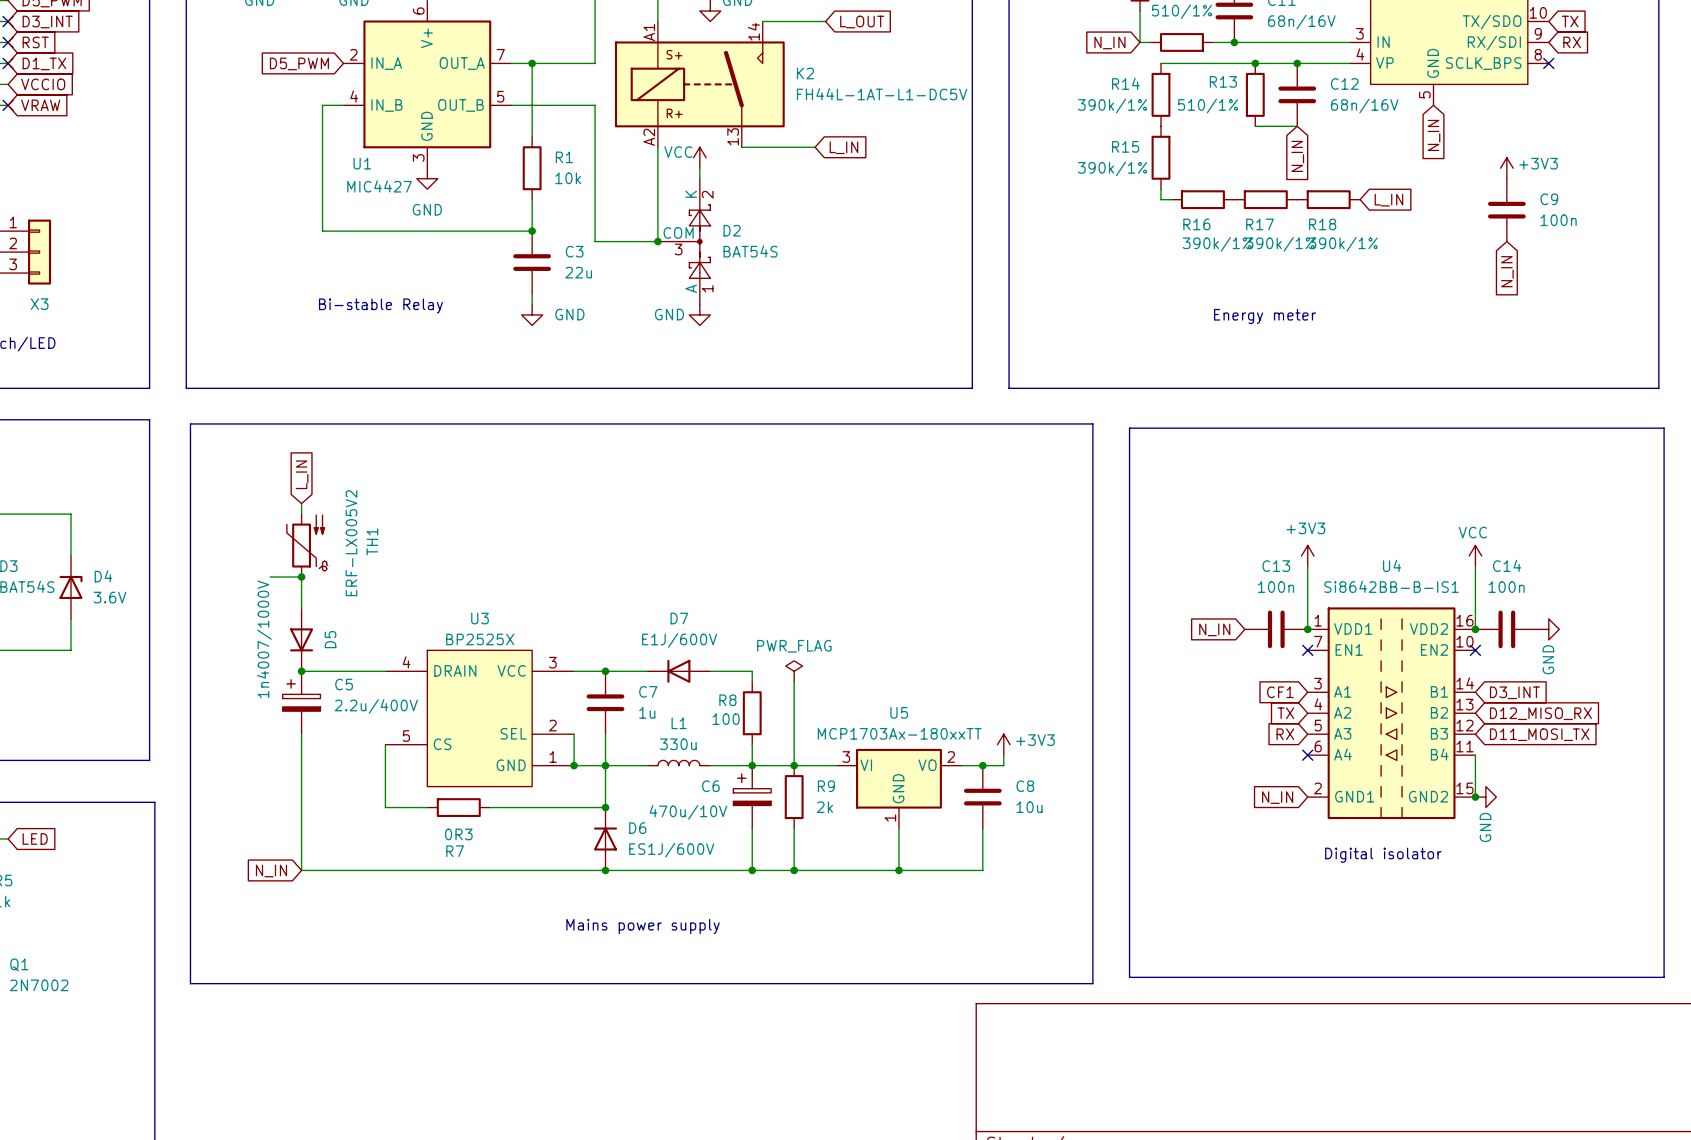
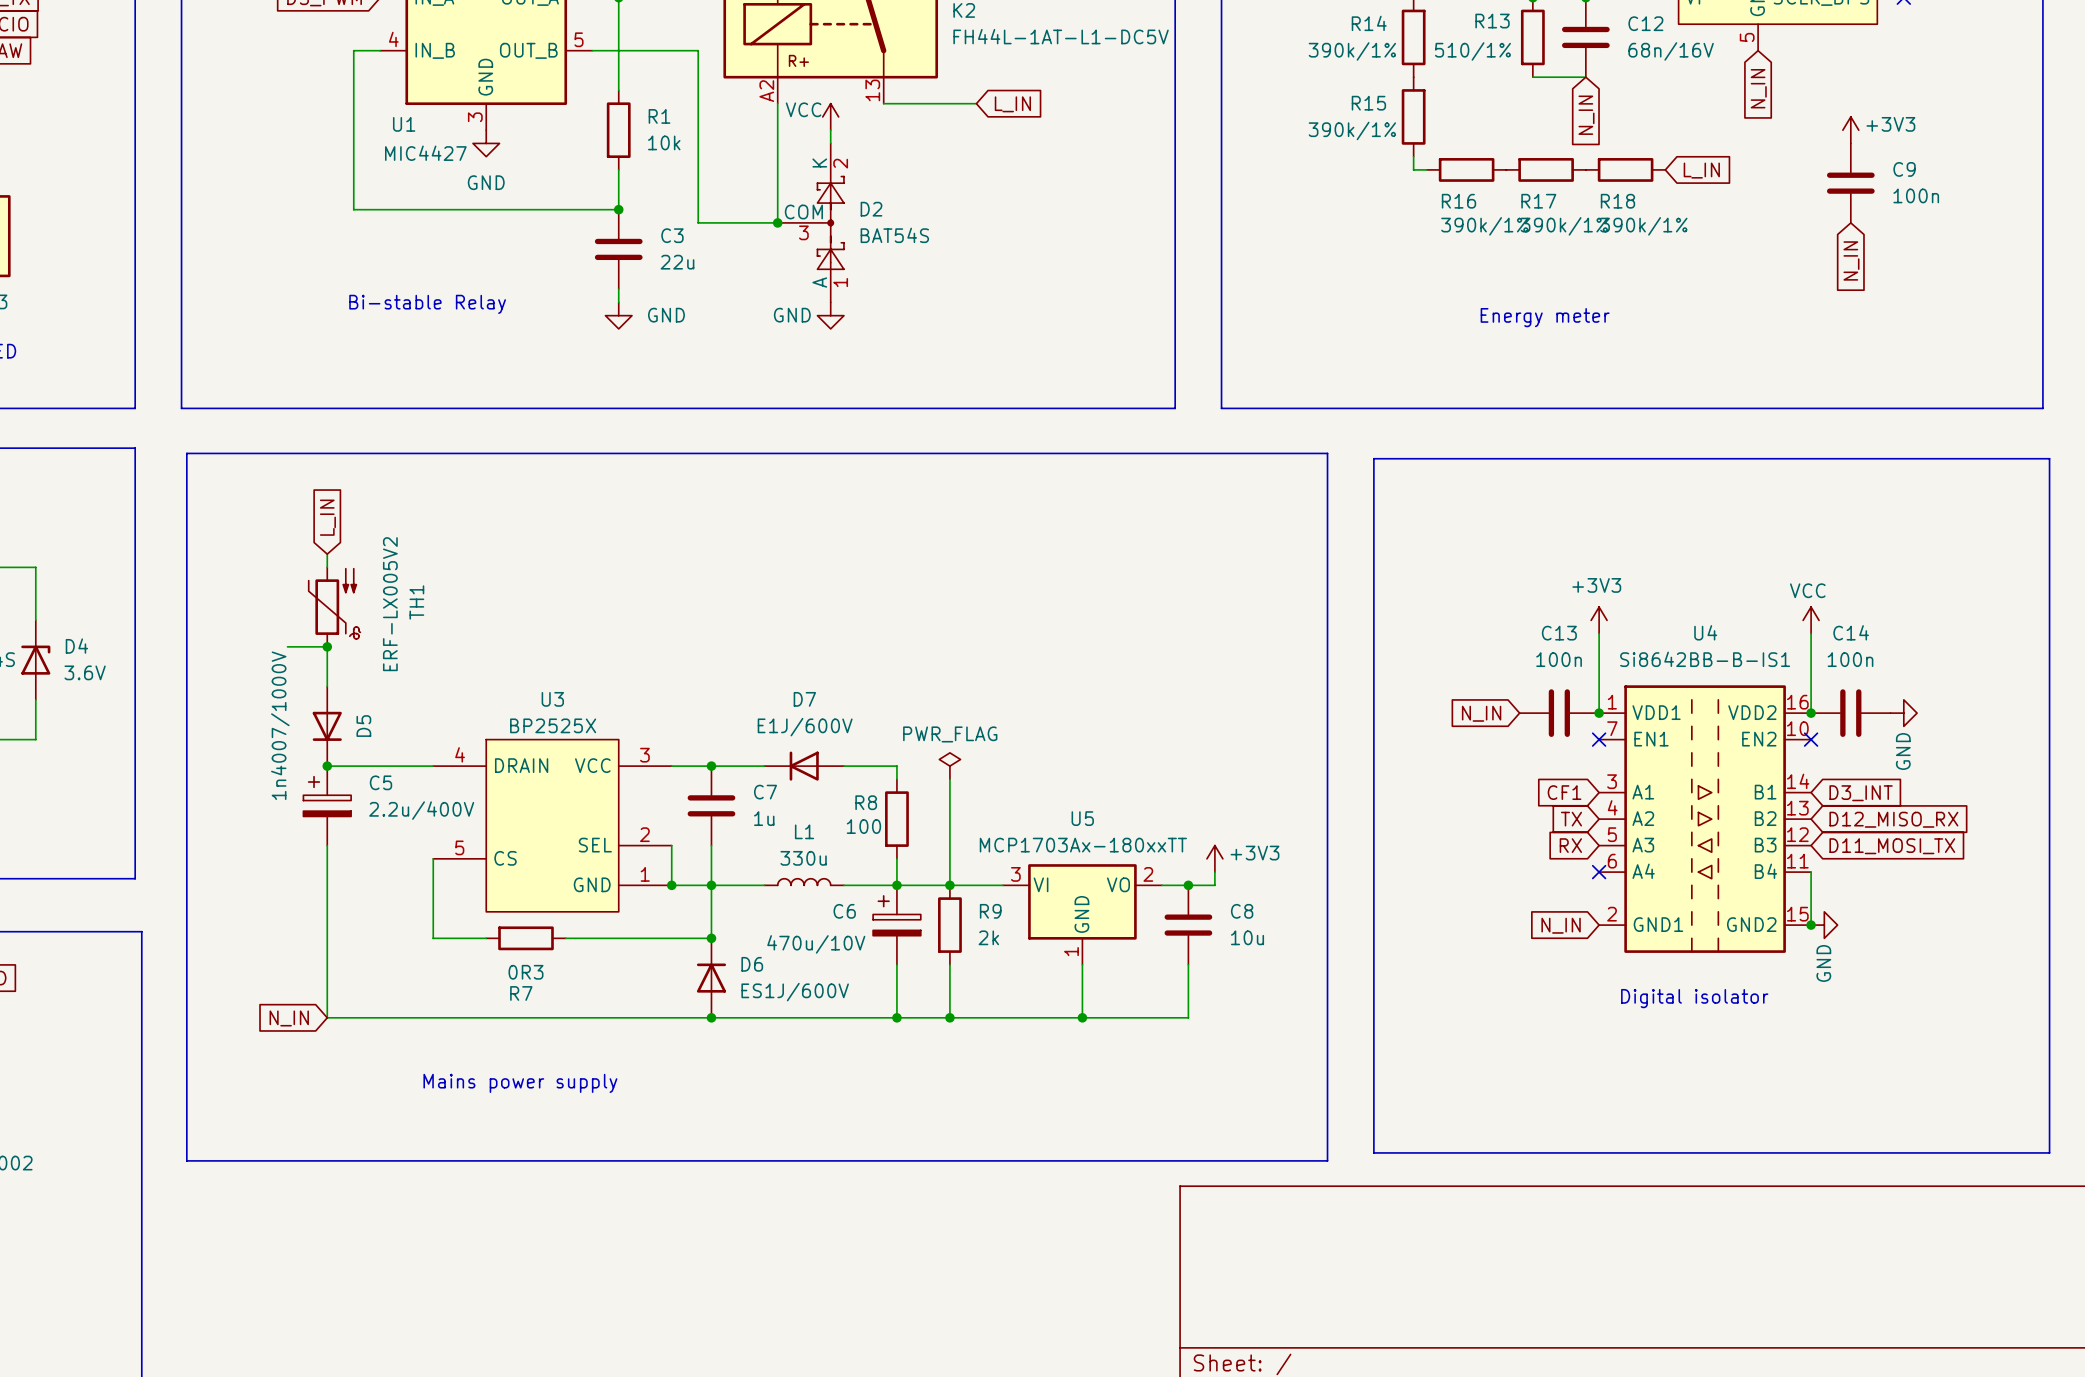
text position: Mains power supply (643, 926) -> Mains power supply (520, 1083)

